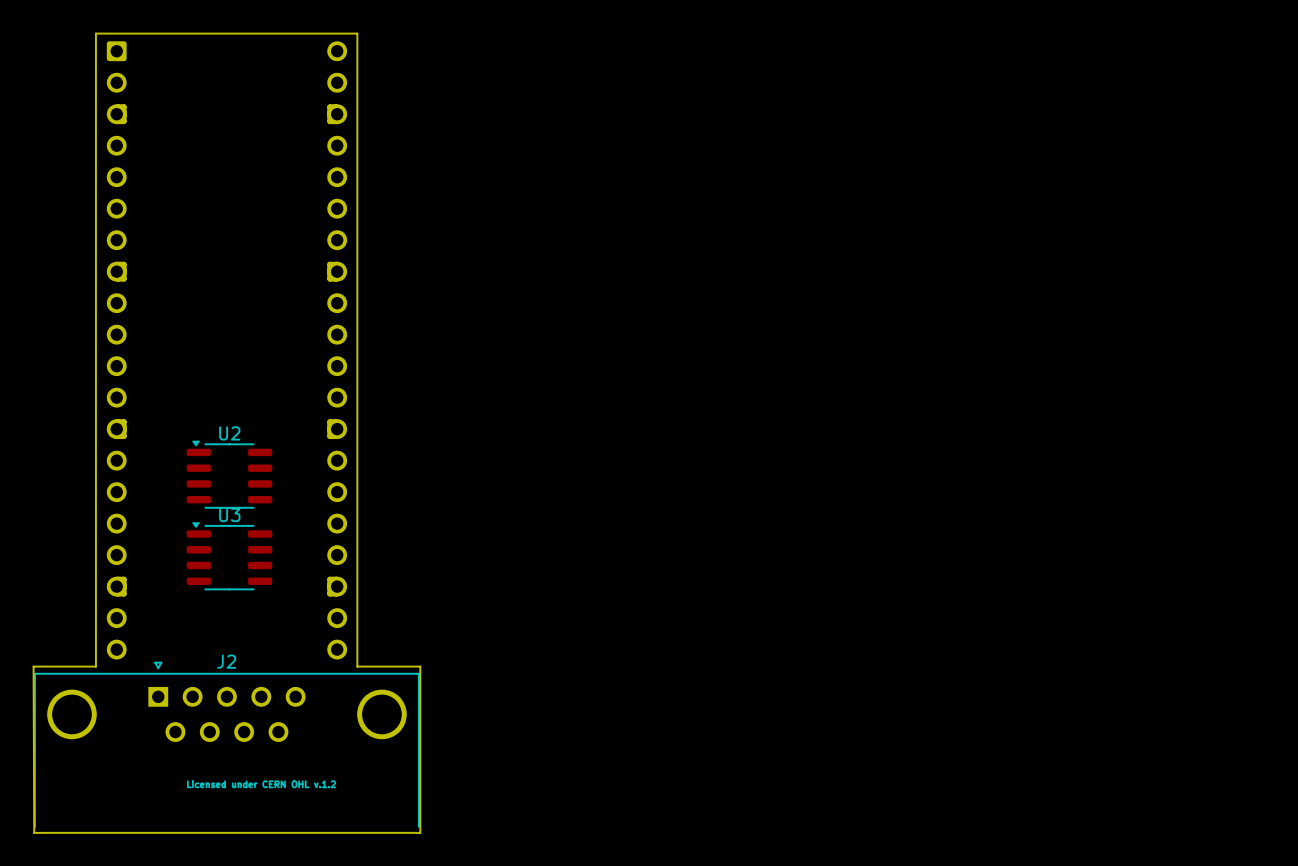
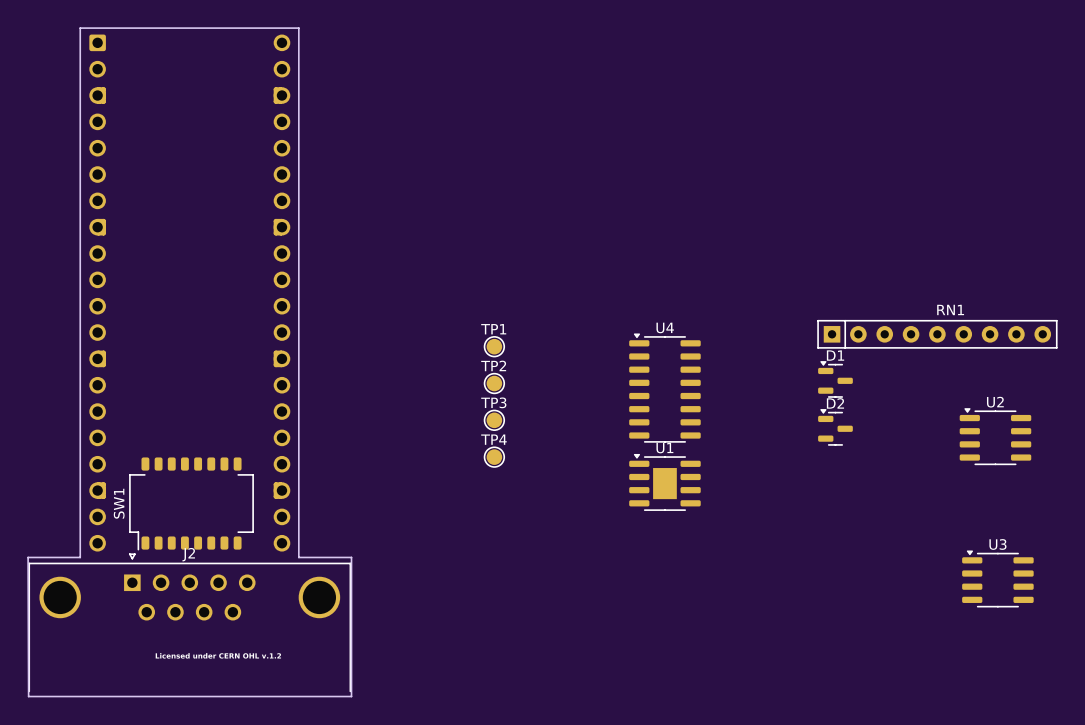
RN1: none -> (937, 334)
TP1: none -> (494, 346)
D1: none -> (835, 379)
TP2: none -> (494, 383)
U4: none -> (664, 388)
U2 position: (229, 474) -> (995, 436)
TP3: none -> (494, 420)
D2: none -> (835, 427)
TP4: none -> (494, 457)
U3 position: (229, 556) -> (997, 578)
U1: none -> (664, 482)
SW1: none -> (191, 503)

